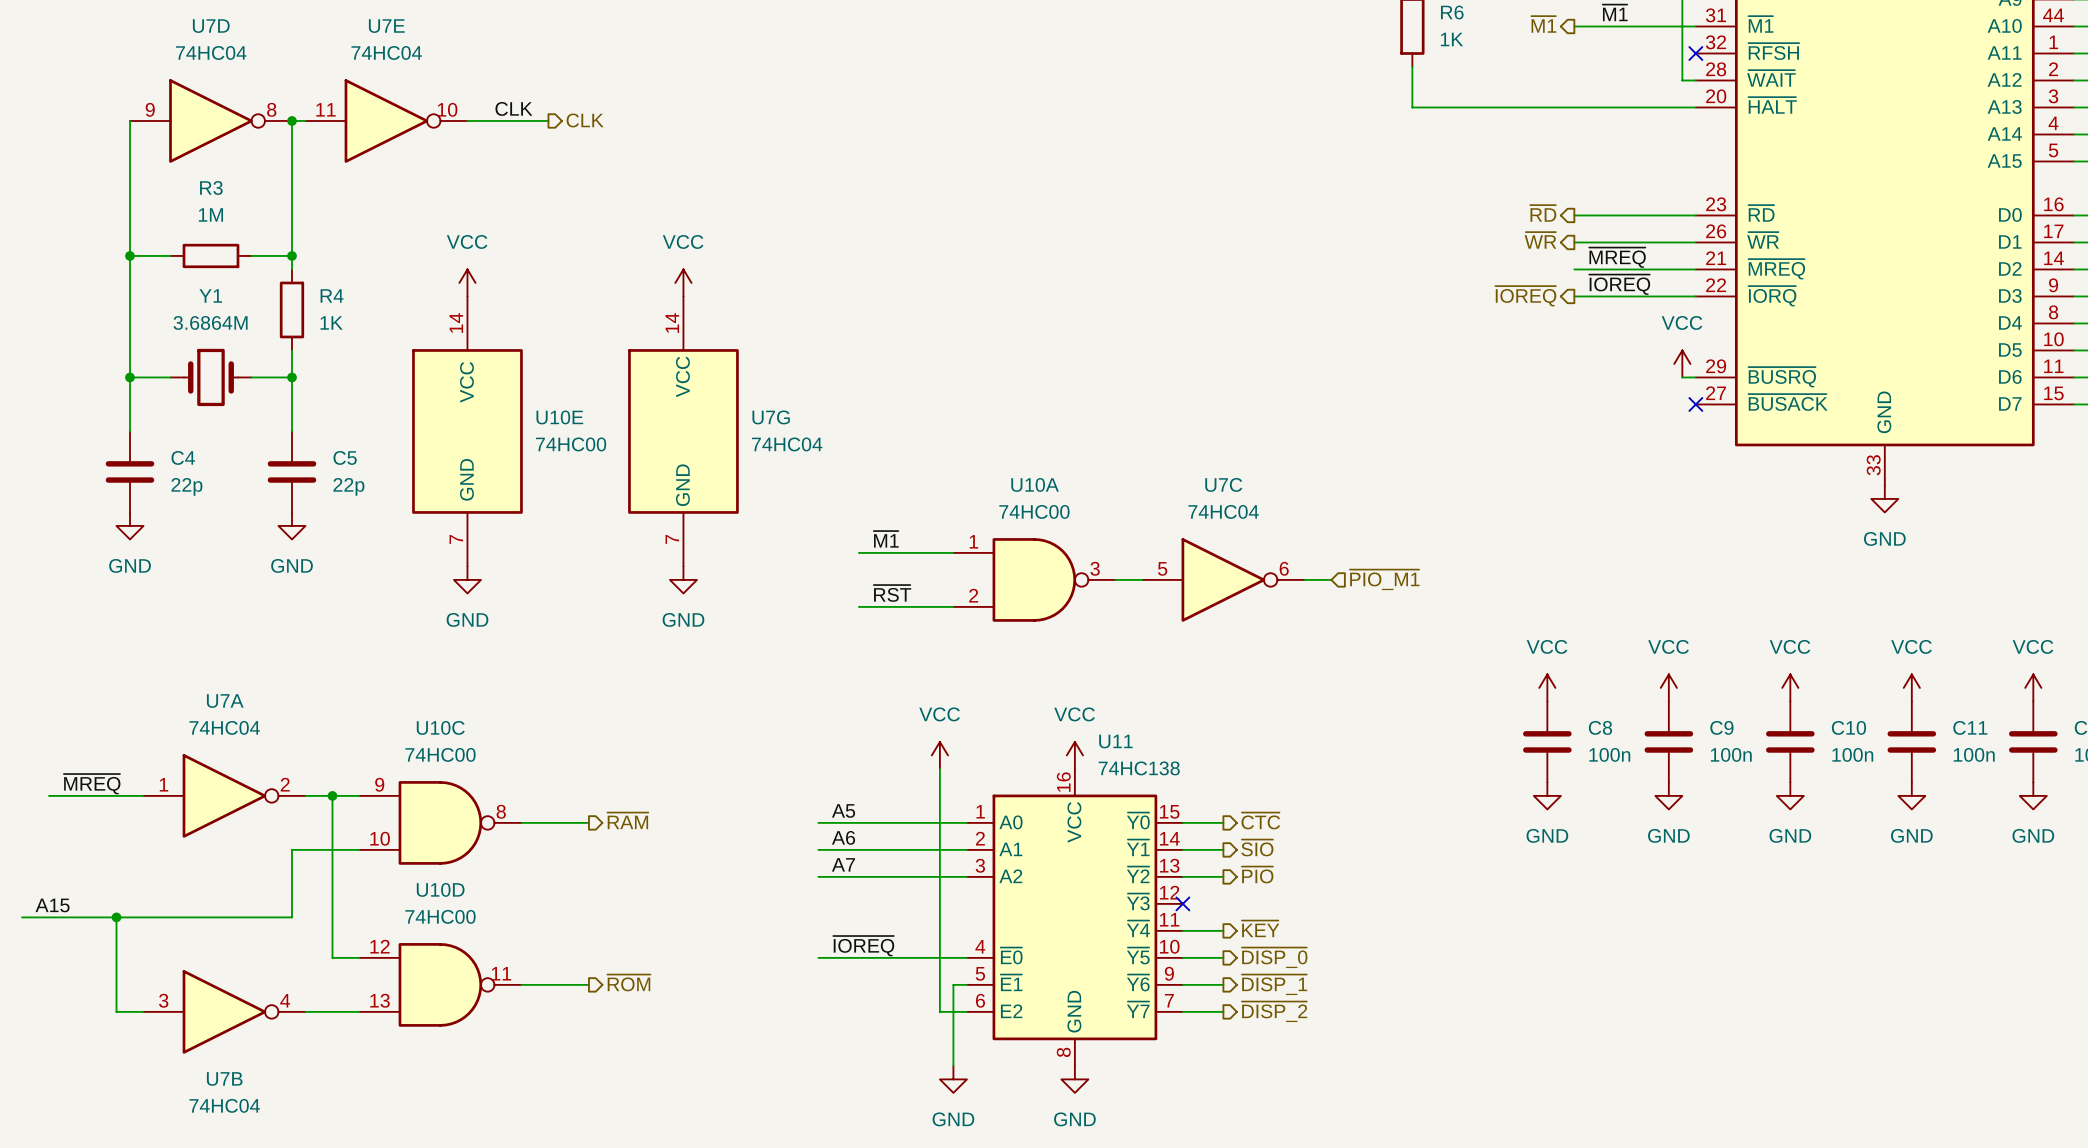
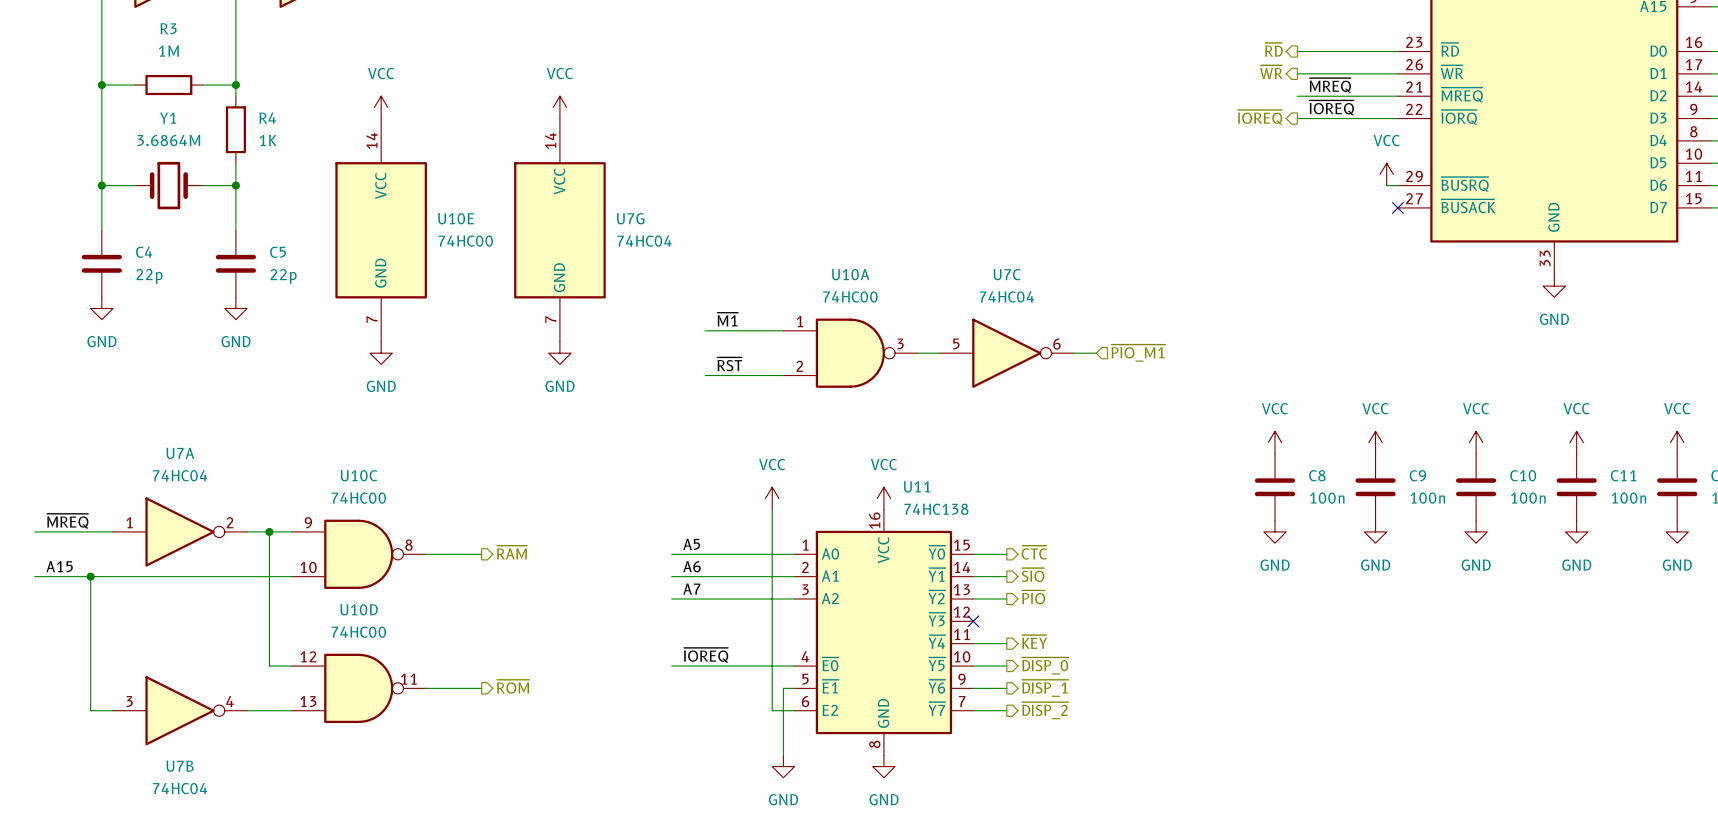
wire: none -> (90, 576) (90, 632)
junction: none -> (90, 576)
wire: (291, 849) (291, 917) (22, 917) -> (235, 576) (34, 576)
label position: A15 (52, 905) -> A15 (59, 566)
junction: (116, 917) -> none

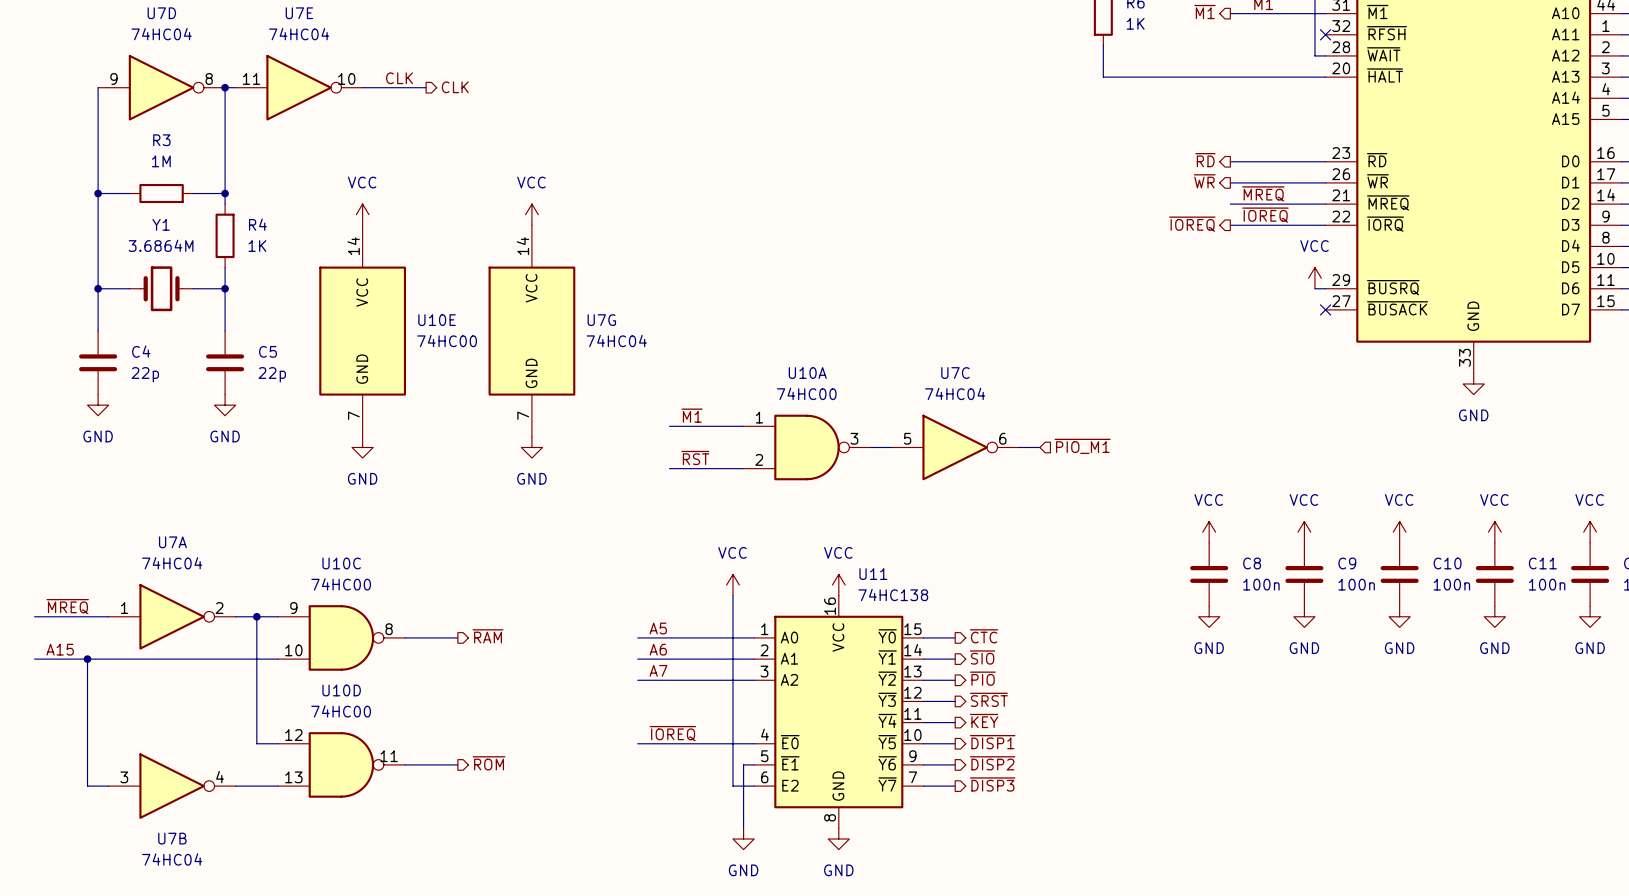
hierarchical label: none -> ~{SRST} (988, 699)
wire: none -> (923, 701) (955, 701)
no-connect mark: (973, 621) -> none
hierarchical label: ~{DISP_0} (1045, 665) -> ~{DISP1} (992, 742)
hierarchical label: ~{DISP_1} (1045, 688) -> ~{DISP2} (992, 763)
hierarchical label: ~{DISP_2} (1045, 710) -> ~{DISP3} (992, 784)

